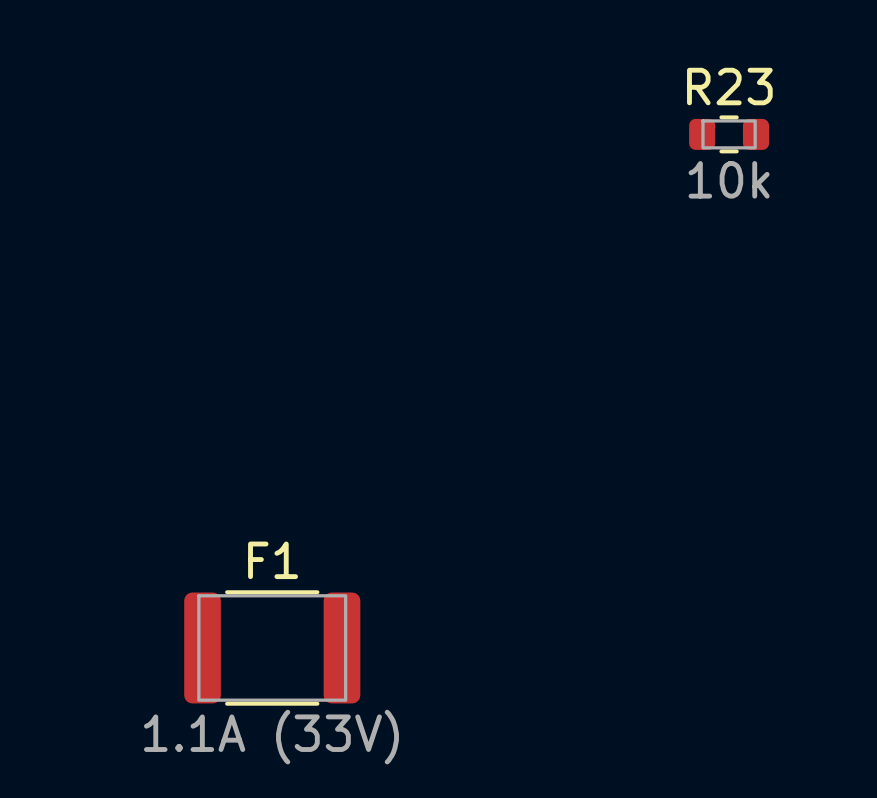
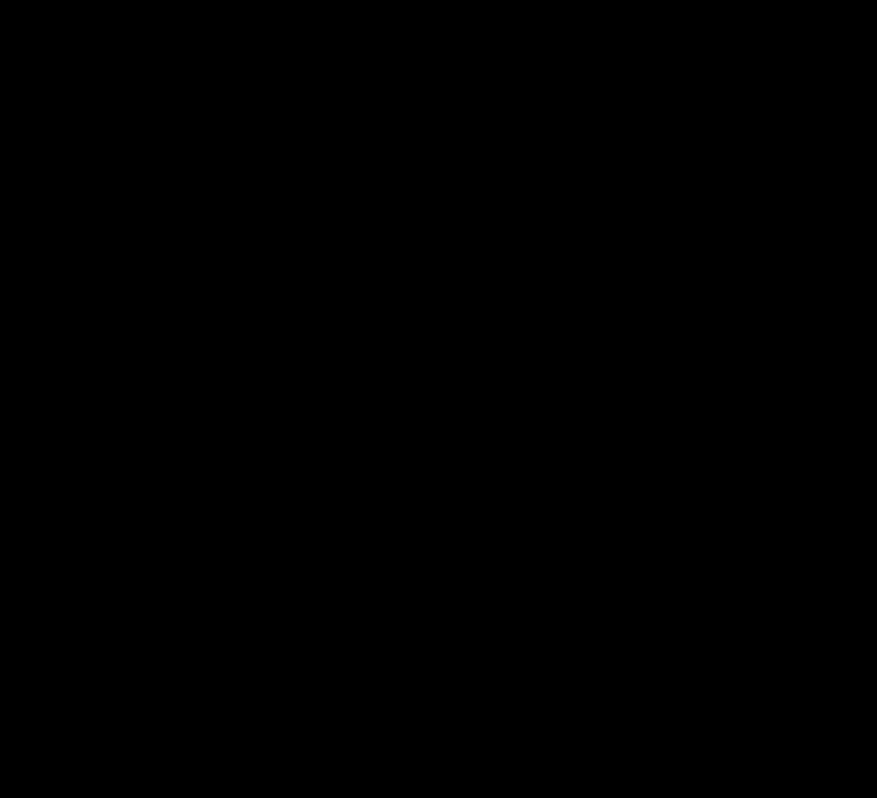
R23: 10k (729, 134) -> none
F1: 1.1A (33V) (272, 647) -> none

